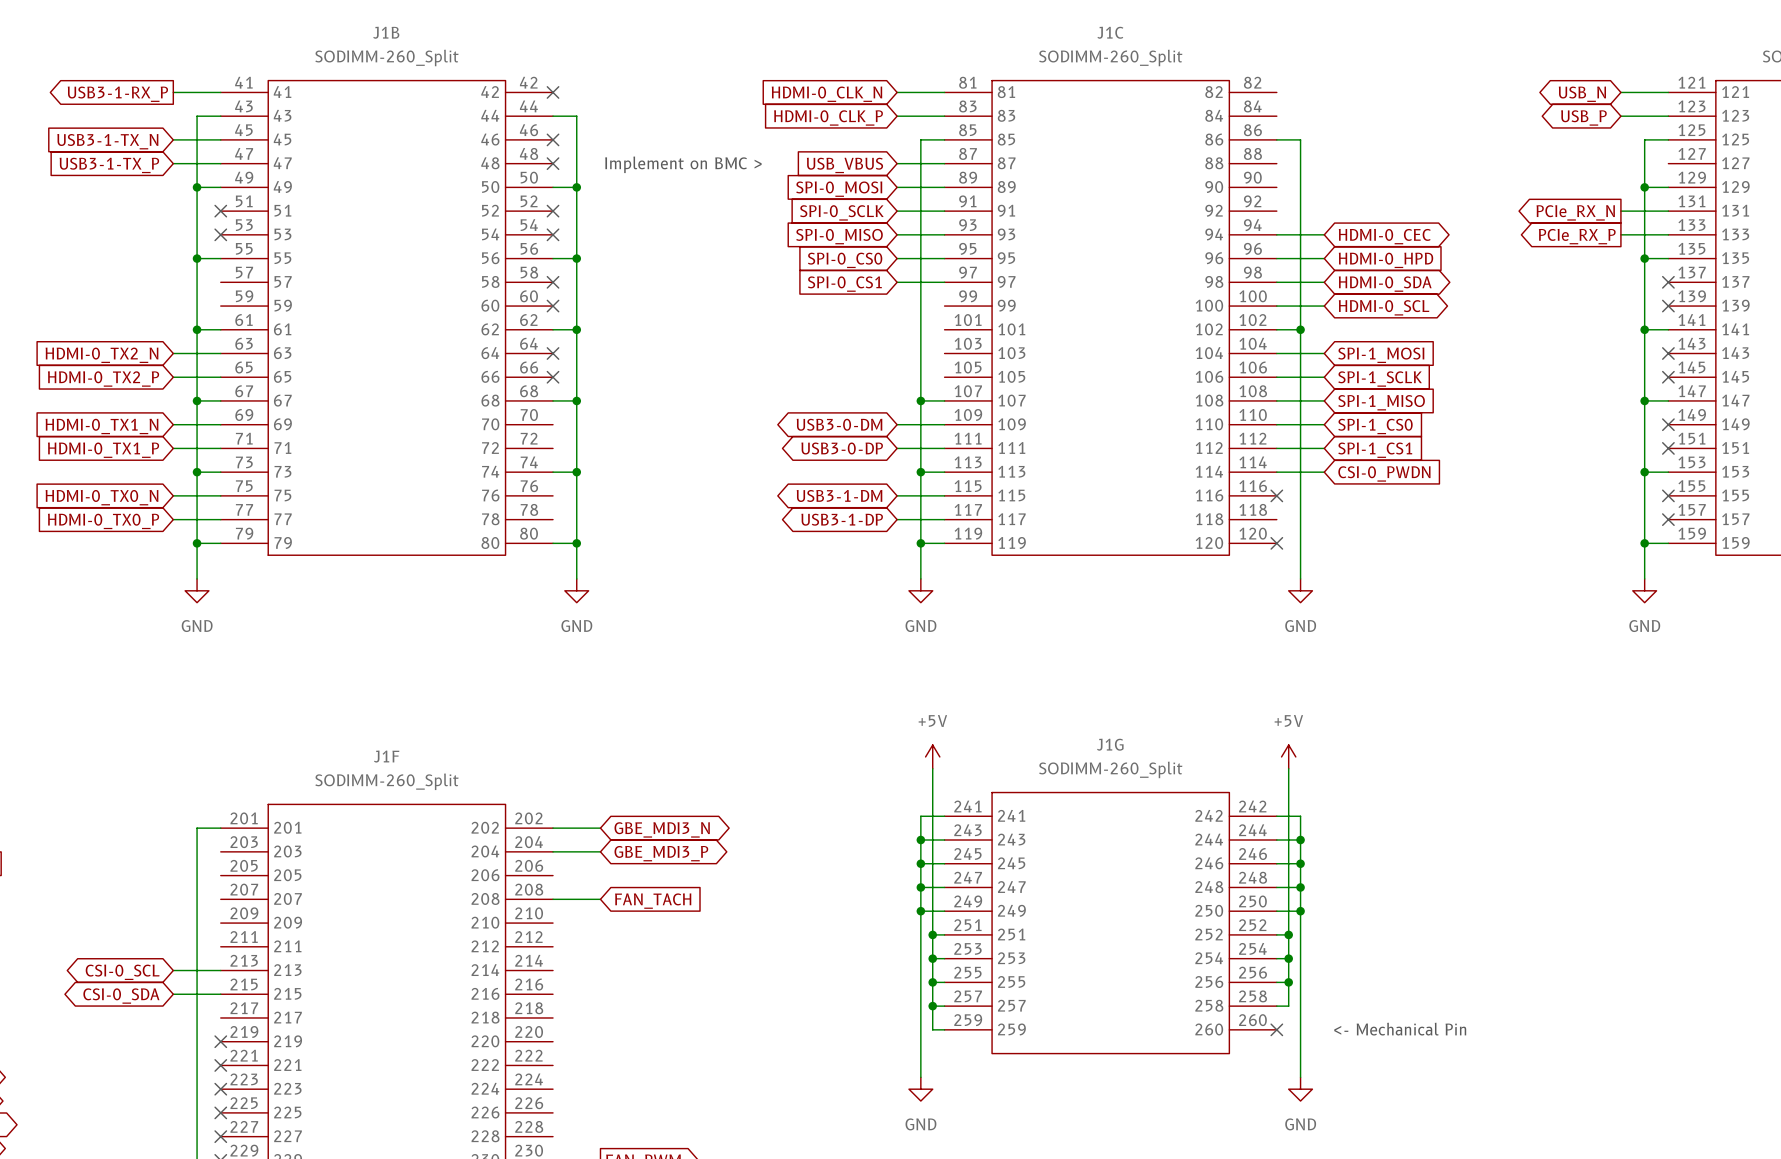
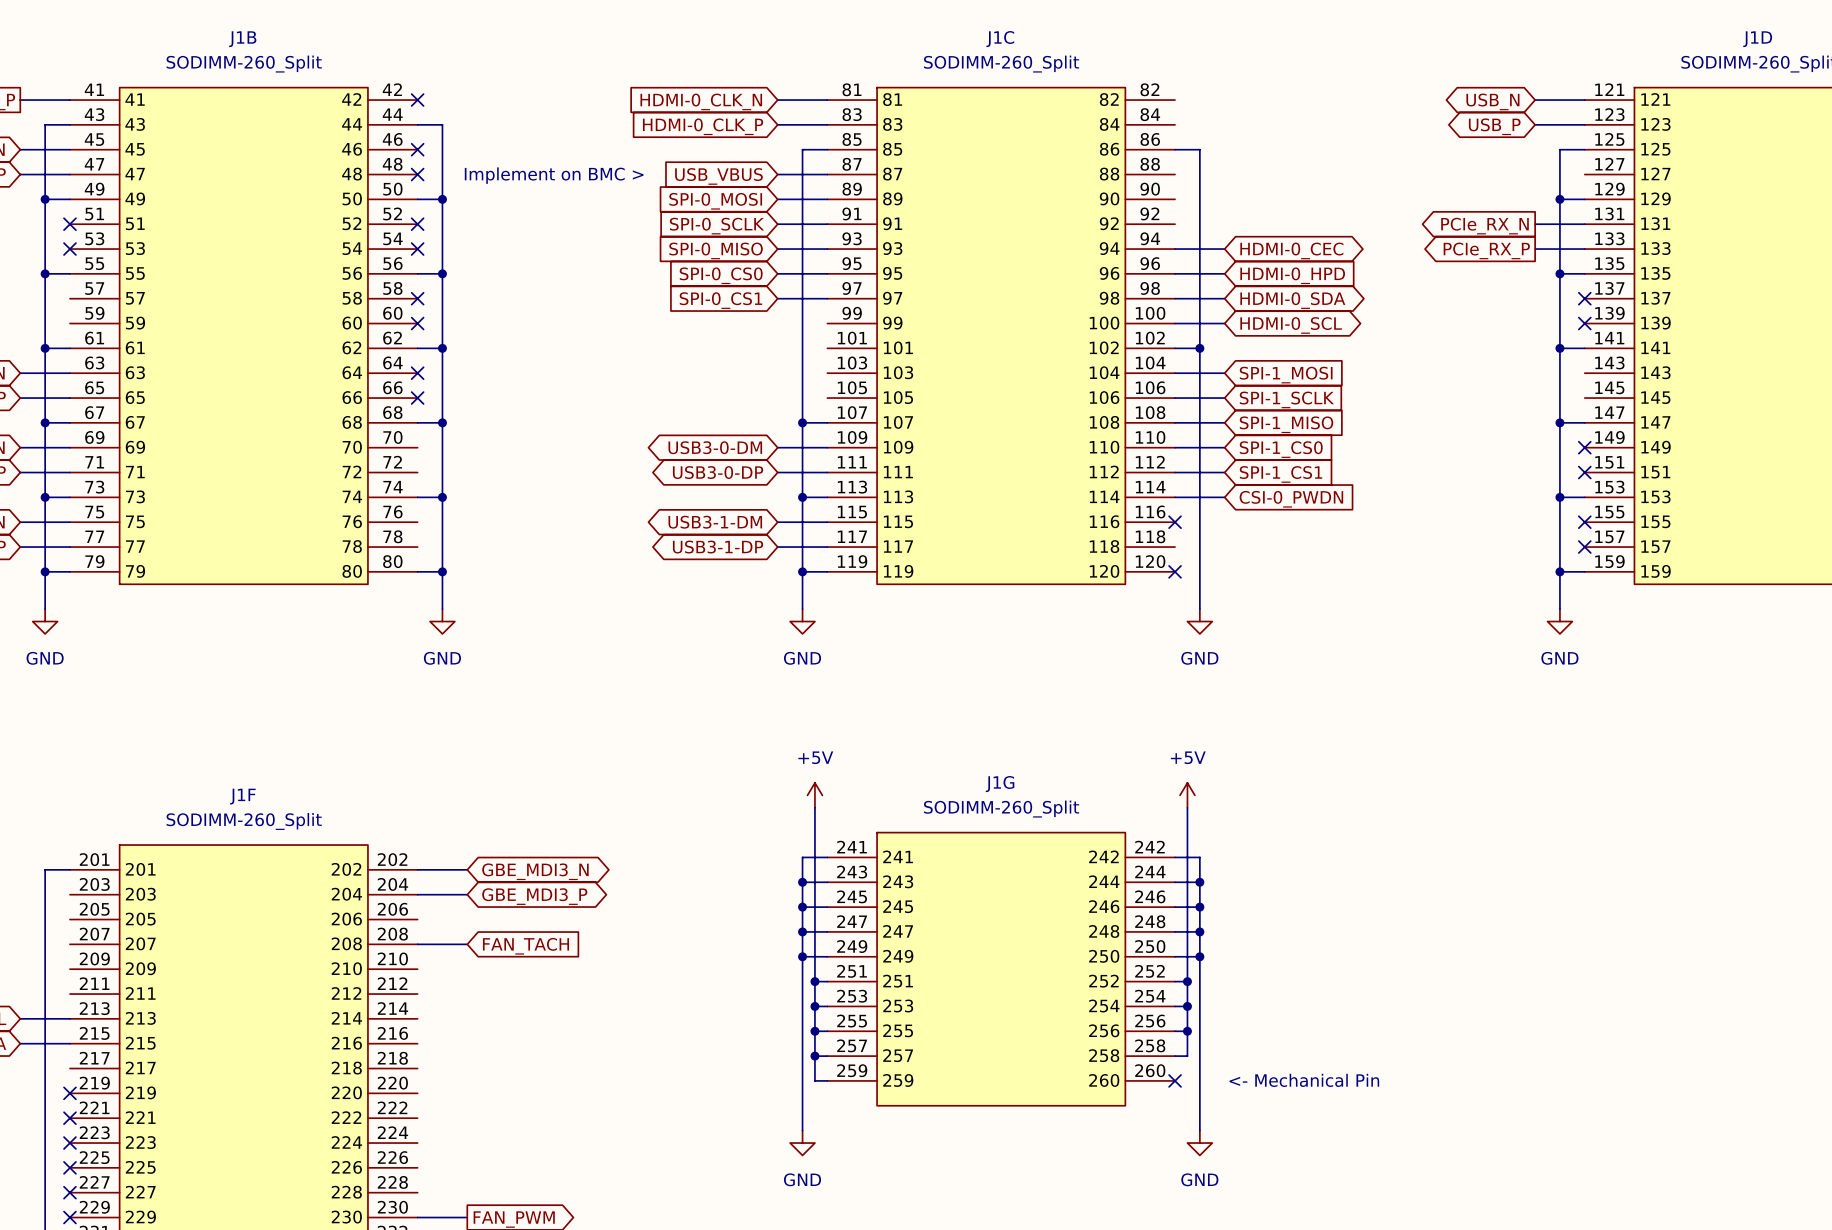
no-connect mark: (1668, 353) -> none
no-connect mark: (1668, 377) -> none

